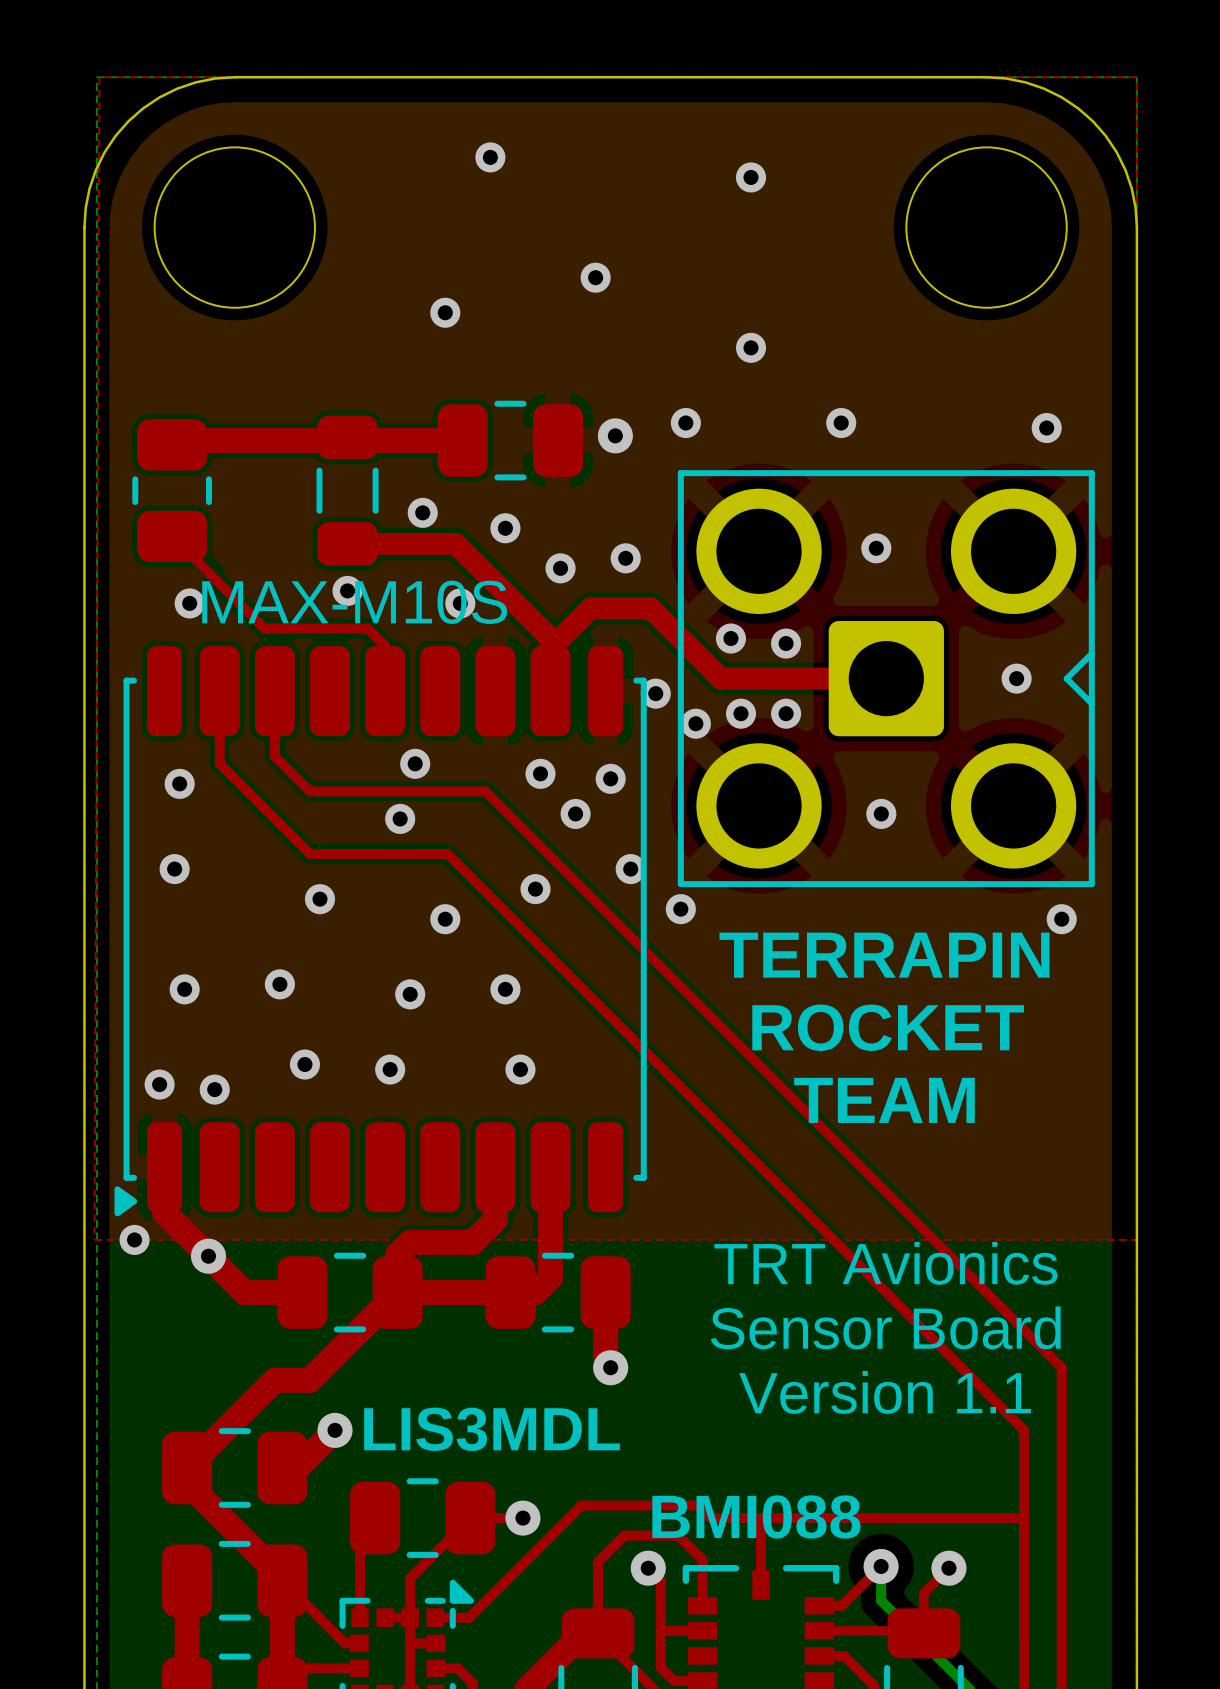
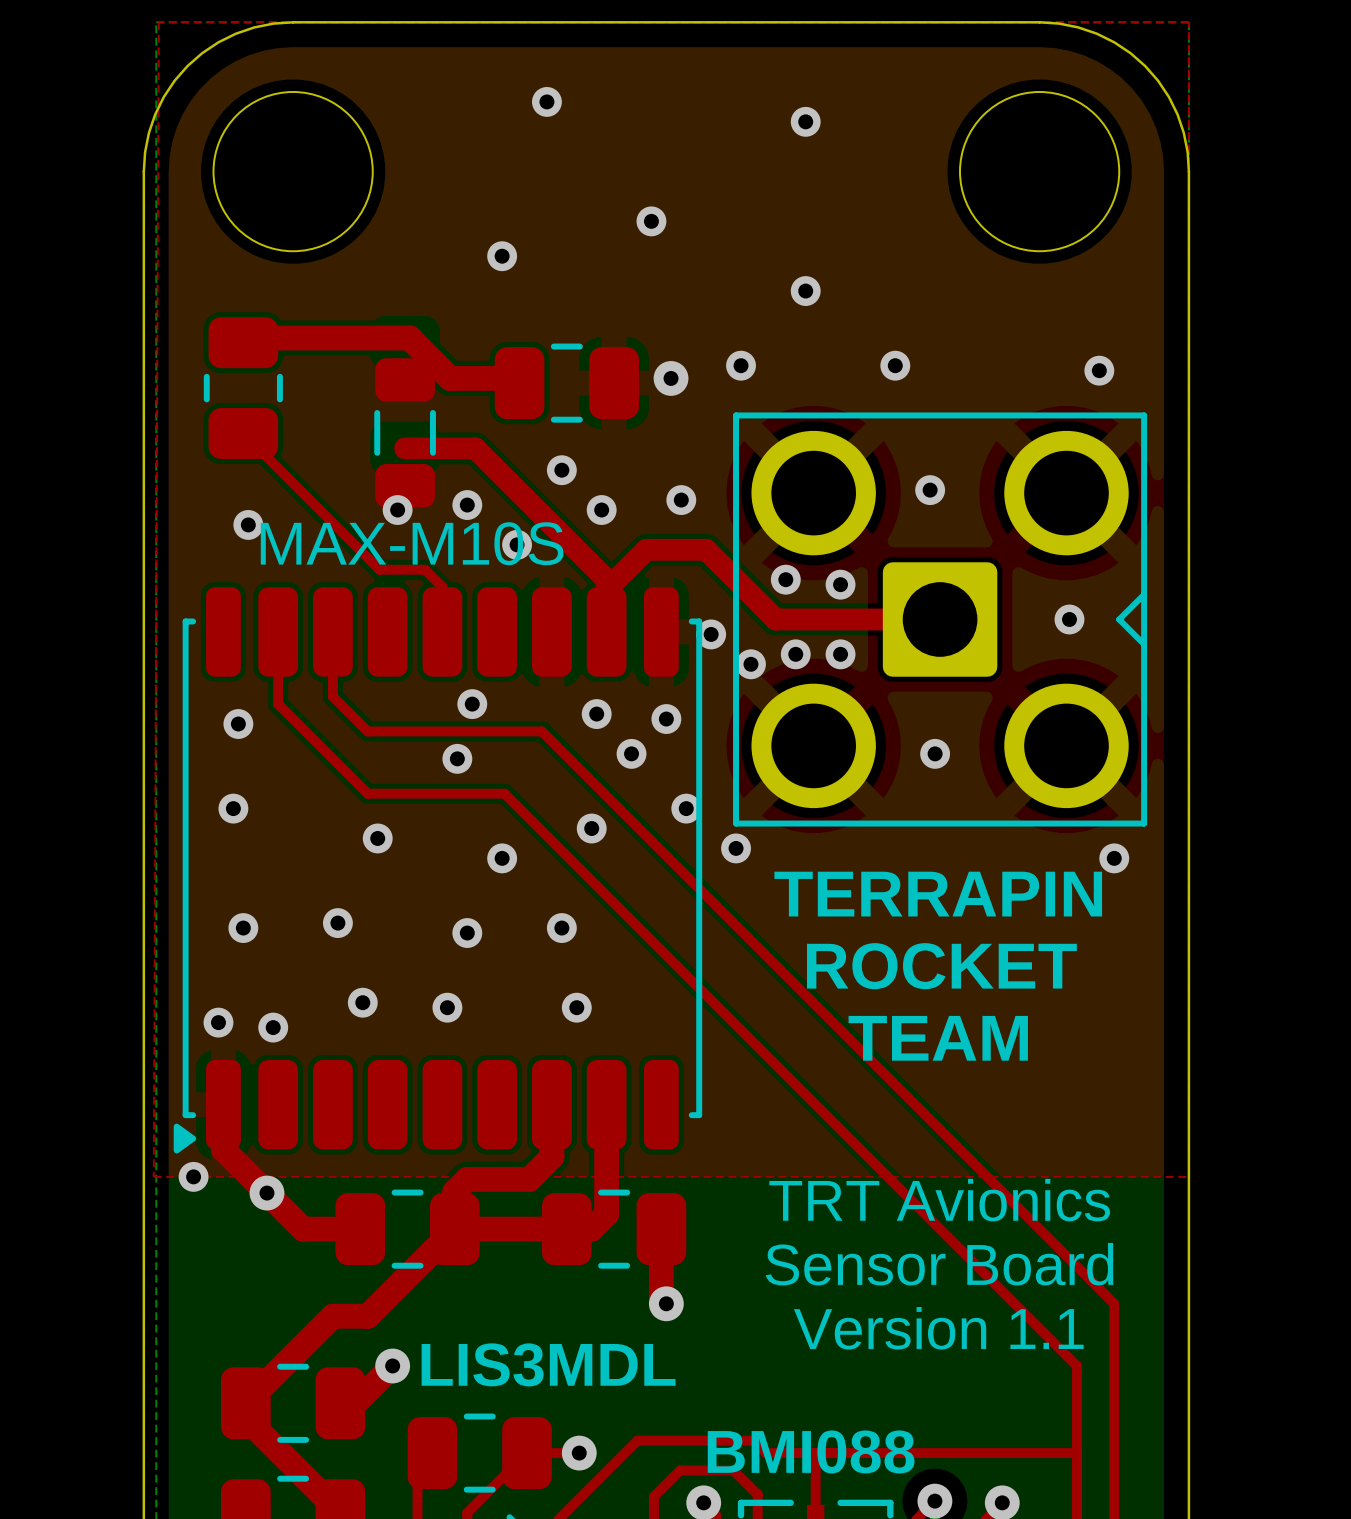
top track: none -> (248, 338) (409, 338) (450, 378) (524, 378)
top track: (462, 440) (176, 440) (172, 444) -> none
part position: (172, 490) -> (243, 388)
via: (422, 512) -> none
top track: (184, 516) (172, 528) (172, 536) (264, 628) (321, 628) -> (243, 433) (379, 569)
top track: (347, 543) (455, 543) -> (405, 448) (475, 448) (512, 485)
via: none -> (467, 505)
via position: (560, 568) -> (601, 510)
via position: (347, 590) -> (397, 510)
via position: (189, 603) -> (248, 524)

